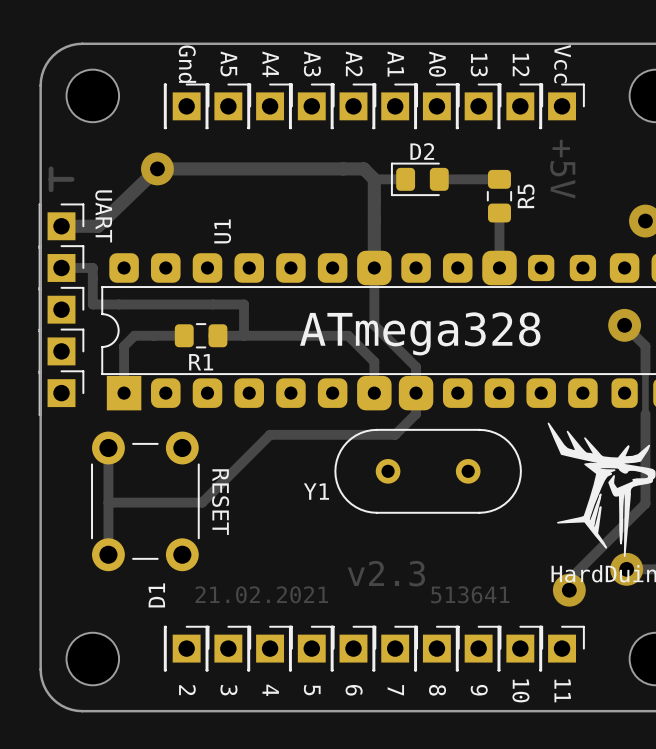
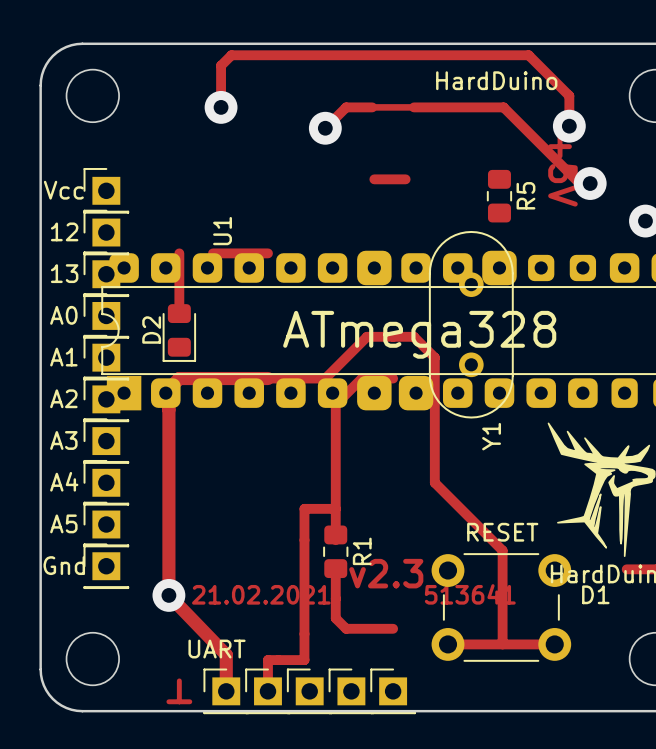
text: A5 (228, 63) -> none
text: A2 (354, 63) -> none
text: Gnd (187, 64) -> none
text: A4 (270, 64) -> none
text: A3 (312, 64) -> none
text: A1 (395, 64) -> none
text: A0 (437, 64) -> none
text: Vcc (562, 64) -> none
text: 13 (479, 65) -> none
text: 12 (521, 65) -> none
text: none -> HardDuino (496, 80)
part: (186, 106) -> none
part: (228, 106) -> none
part: (270, 106) -> none
part: (311, 106) -> none
part: (353, 106) -> none
part: (395, 106) -> none
part: (436, 106) -> none
part: (478, 106) -> none
part: (520, 106) -> none
part: (562, 106) -> none
track: none -> (221, 107) (221, 65) (231, 55) (528, 55) (569, 95) (569, 126)
via: none -> (221, 107)
via: none -> (569, 126)
track: none -> (325, 128) (346, 107) (503, 107) (579, 183) (590, 183)
via: none -> (325, 128)
track: (51, 168) (51, 189) -> none
via: (157, 168) -> none
track: (51, 179) (71, 179) -> none
D2 rotation: 0° (419, 179) -> 90° counterclockwise (179, 333)
D2 position: (419, 179) -> (179, 333)
track: (439, 179) (499, 179) -> none
via: none -> (590, 183)
text: none -> Vcc (63, 190)
part: none -> (106, 190)
track: (499, 213) (499, 267) -> none
text: UART (103, 216) -> none
track: (61, 226) (98, 226) (157, 168) (363, 168) (374, 179) (374, 325) (416, 367) (416, 413) (395, 434) (270, 434) (202, 502) (108, 502) -> none
part: (61, 226) -> none
text: none -> 12 (64, 231)
part: none -> (106, 232)
track: none -> (179, 253) (179, 313)
track: none -> (213, 253) (267, 253)
track: (61, 267) (92, 267) (92, 304) (244, 304) (244, 335) -> none
part: (61, 267) -> none
text: none -> 13 (64, 273)
part: none -> (106, 274)
part: (61, 309) -> none
text: none -> A0 (63, 315)
part: none -> (106, 315)
track: (624, 325) (645, 346) (645, 503) (569, 579) (569, 590) -> none
via: (624, 325) -> none
track: (184, 335) (134, 335) (124, 346) (124, 393) -> none
R1 rotation: 0° (201, 335) -> 90° clockwise (335, 551)
R1 position: (201, 335) -> (335, 551)
track: (212, 335) (348, 335) (374, 361) (374, 393) -> none
part: (61, 351) -> none
text: none -> A1 (63, 357)
part: none -> (106, 357)
R1 name position: R1 (201, 362) -> R1 (362, 551)
track: none -> (393, 378) (361, 378) (335, 404) (335, 540)
part: (61, 393) -> none
text: none -> A2 (63, 398)
part: none -> (106, 399)
text: none -> A3 (63, 440)
part: none -> (106, 441)
track: (108, 448) (108, 554) -> none
Y1 rotation: 0° (428, 471) -> 90° clockwise (471, 324)
Y1 position: (428, 471) -> (471, 324)
text: none -> A4 (64, 481)
part: none -> (106, 482)
Y1 name position: Y1 (316, 491) -> Y1 (491, 436)
D1 rotation: 0° (145, 501) -> 90° clockwise (501, 607)
D1 position: (145, 501) -> (501, 607)
text rotation: 0° (220, 502) -> 90° counterclockwise (502, 532)
text position: RESET (220, 502) -> RESET (502, 532)
track: none -> (335, 508) (304, 508) (304, 660) (267, 660) (267, 691)
text: none -> A5 (63, 523)
part: none -> (106, 524)
text: none -> Gnd (64, 565)
part: none -> (106, 566)
track: none -> (335, 568) (335, 618) (346, 628) (393, 628)
via: (626, 569) -> none
via: (569, 590) -> none
D1 name position: D1 (156, 595) -> D1 (595, 594)
via: none -> (168, 595)
track: none -> (448, 644) (554, 644)
track: none -> (502, 644) (502, 550) (434, 482) (434, 357) (413, 336) (367, 336) (325, 378) (179, 378) (168, 388) (168, 595) (226, 654) (226, 691)
part: (186, 648) -> none
part: (228, 648) -> none
part: (270, 648) -> none
part: (311, 648) -> none
part: (353, 648) -> none
part: (395, 648) -> none
part: (436, 648) -> none
part: (478, 648) -> none
part: (520, 648) -> none
part: (562, 648) -> none
text: none -> UART (217, 649)
track: none -> (179, 680) (179, 701)
text: 2 (187, 690) -> none
text: 3 (228, 690) -> none
text: 4 (270, 690) -> none
text: 5 (312, 690) -> none
text: 6 (354, 690) -> none
text: 7 (395, 690) -> none
text: 8 (437, 690) -> none
text: 9 (479, 690) -> none
text: 10 (520, 690) -> none
text: 11 (562, 690) -> none
part: none -> (226, 691)
part: none -> (267, 691)
part: none -> (309, 691)
part: none -> (351, 691)
part: none -> (393, 691)
track: none -> (168, 701) (189, 701)

